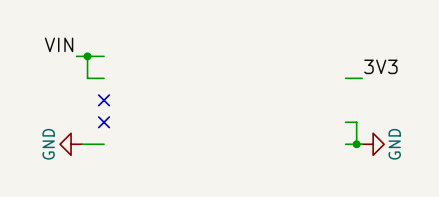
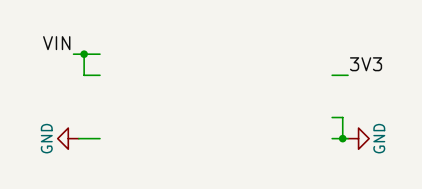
no-connect mark: (104, 100) -> none
no-connect mark: (104, 122) -> none

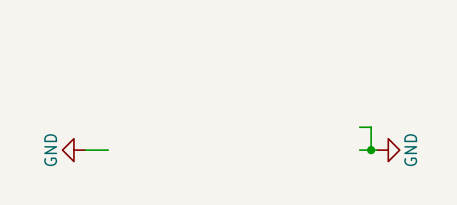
label: VIN (56, 43) -> none
wire: (73, 54) (99, 54) -> none
wire: (84, 54) (84, 75) (99, 75) -> none
junction: (84, 54) -> none
label: 3V3 (366, 64) -> none
wire: (332, 75) (348, 75) -> none

